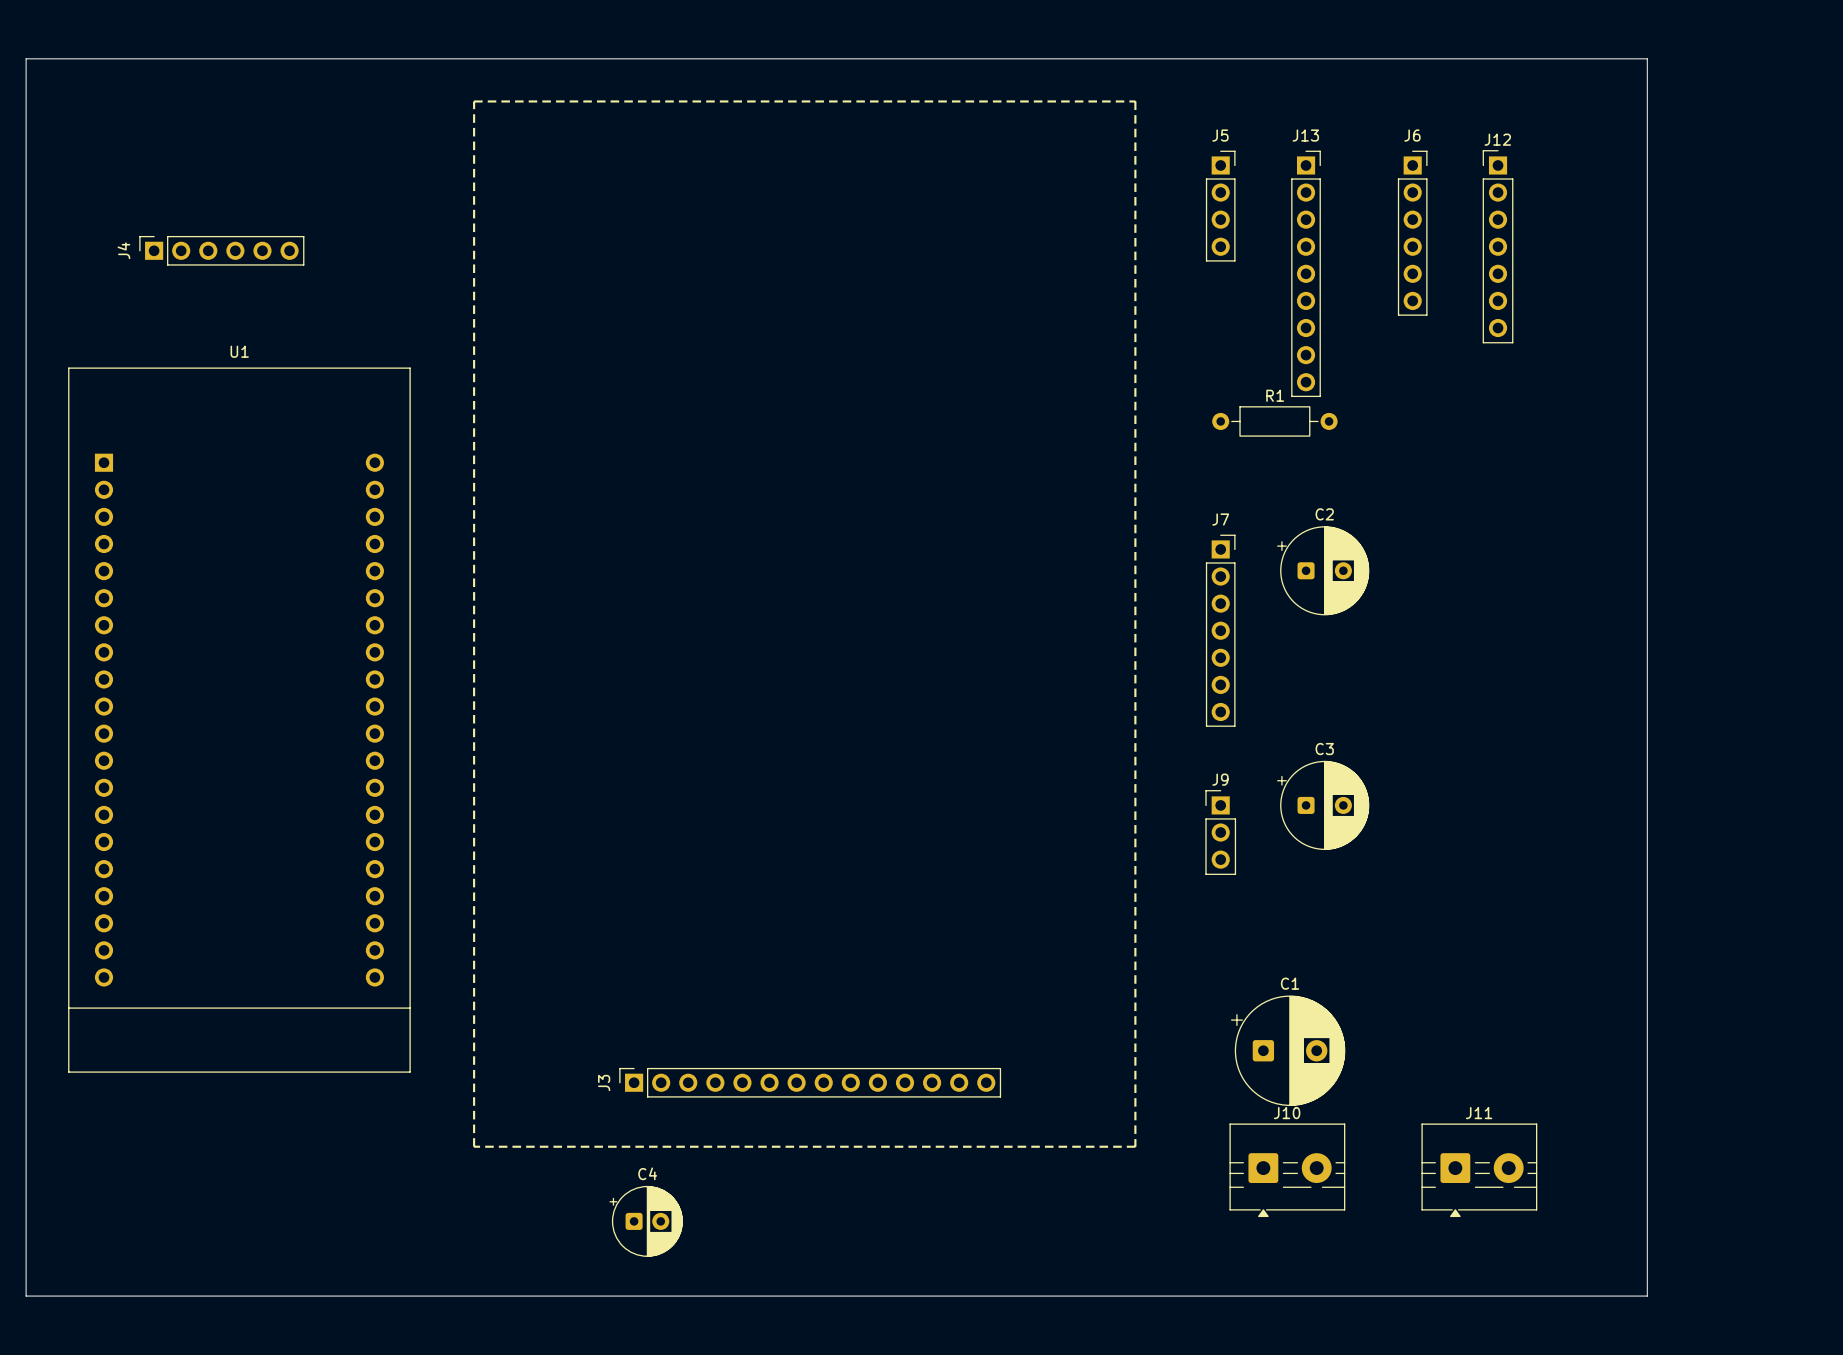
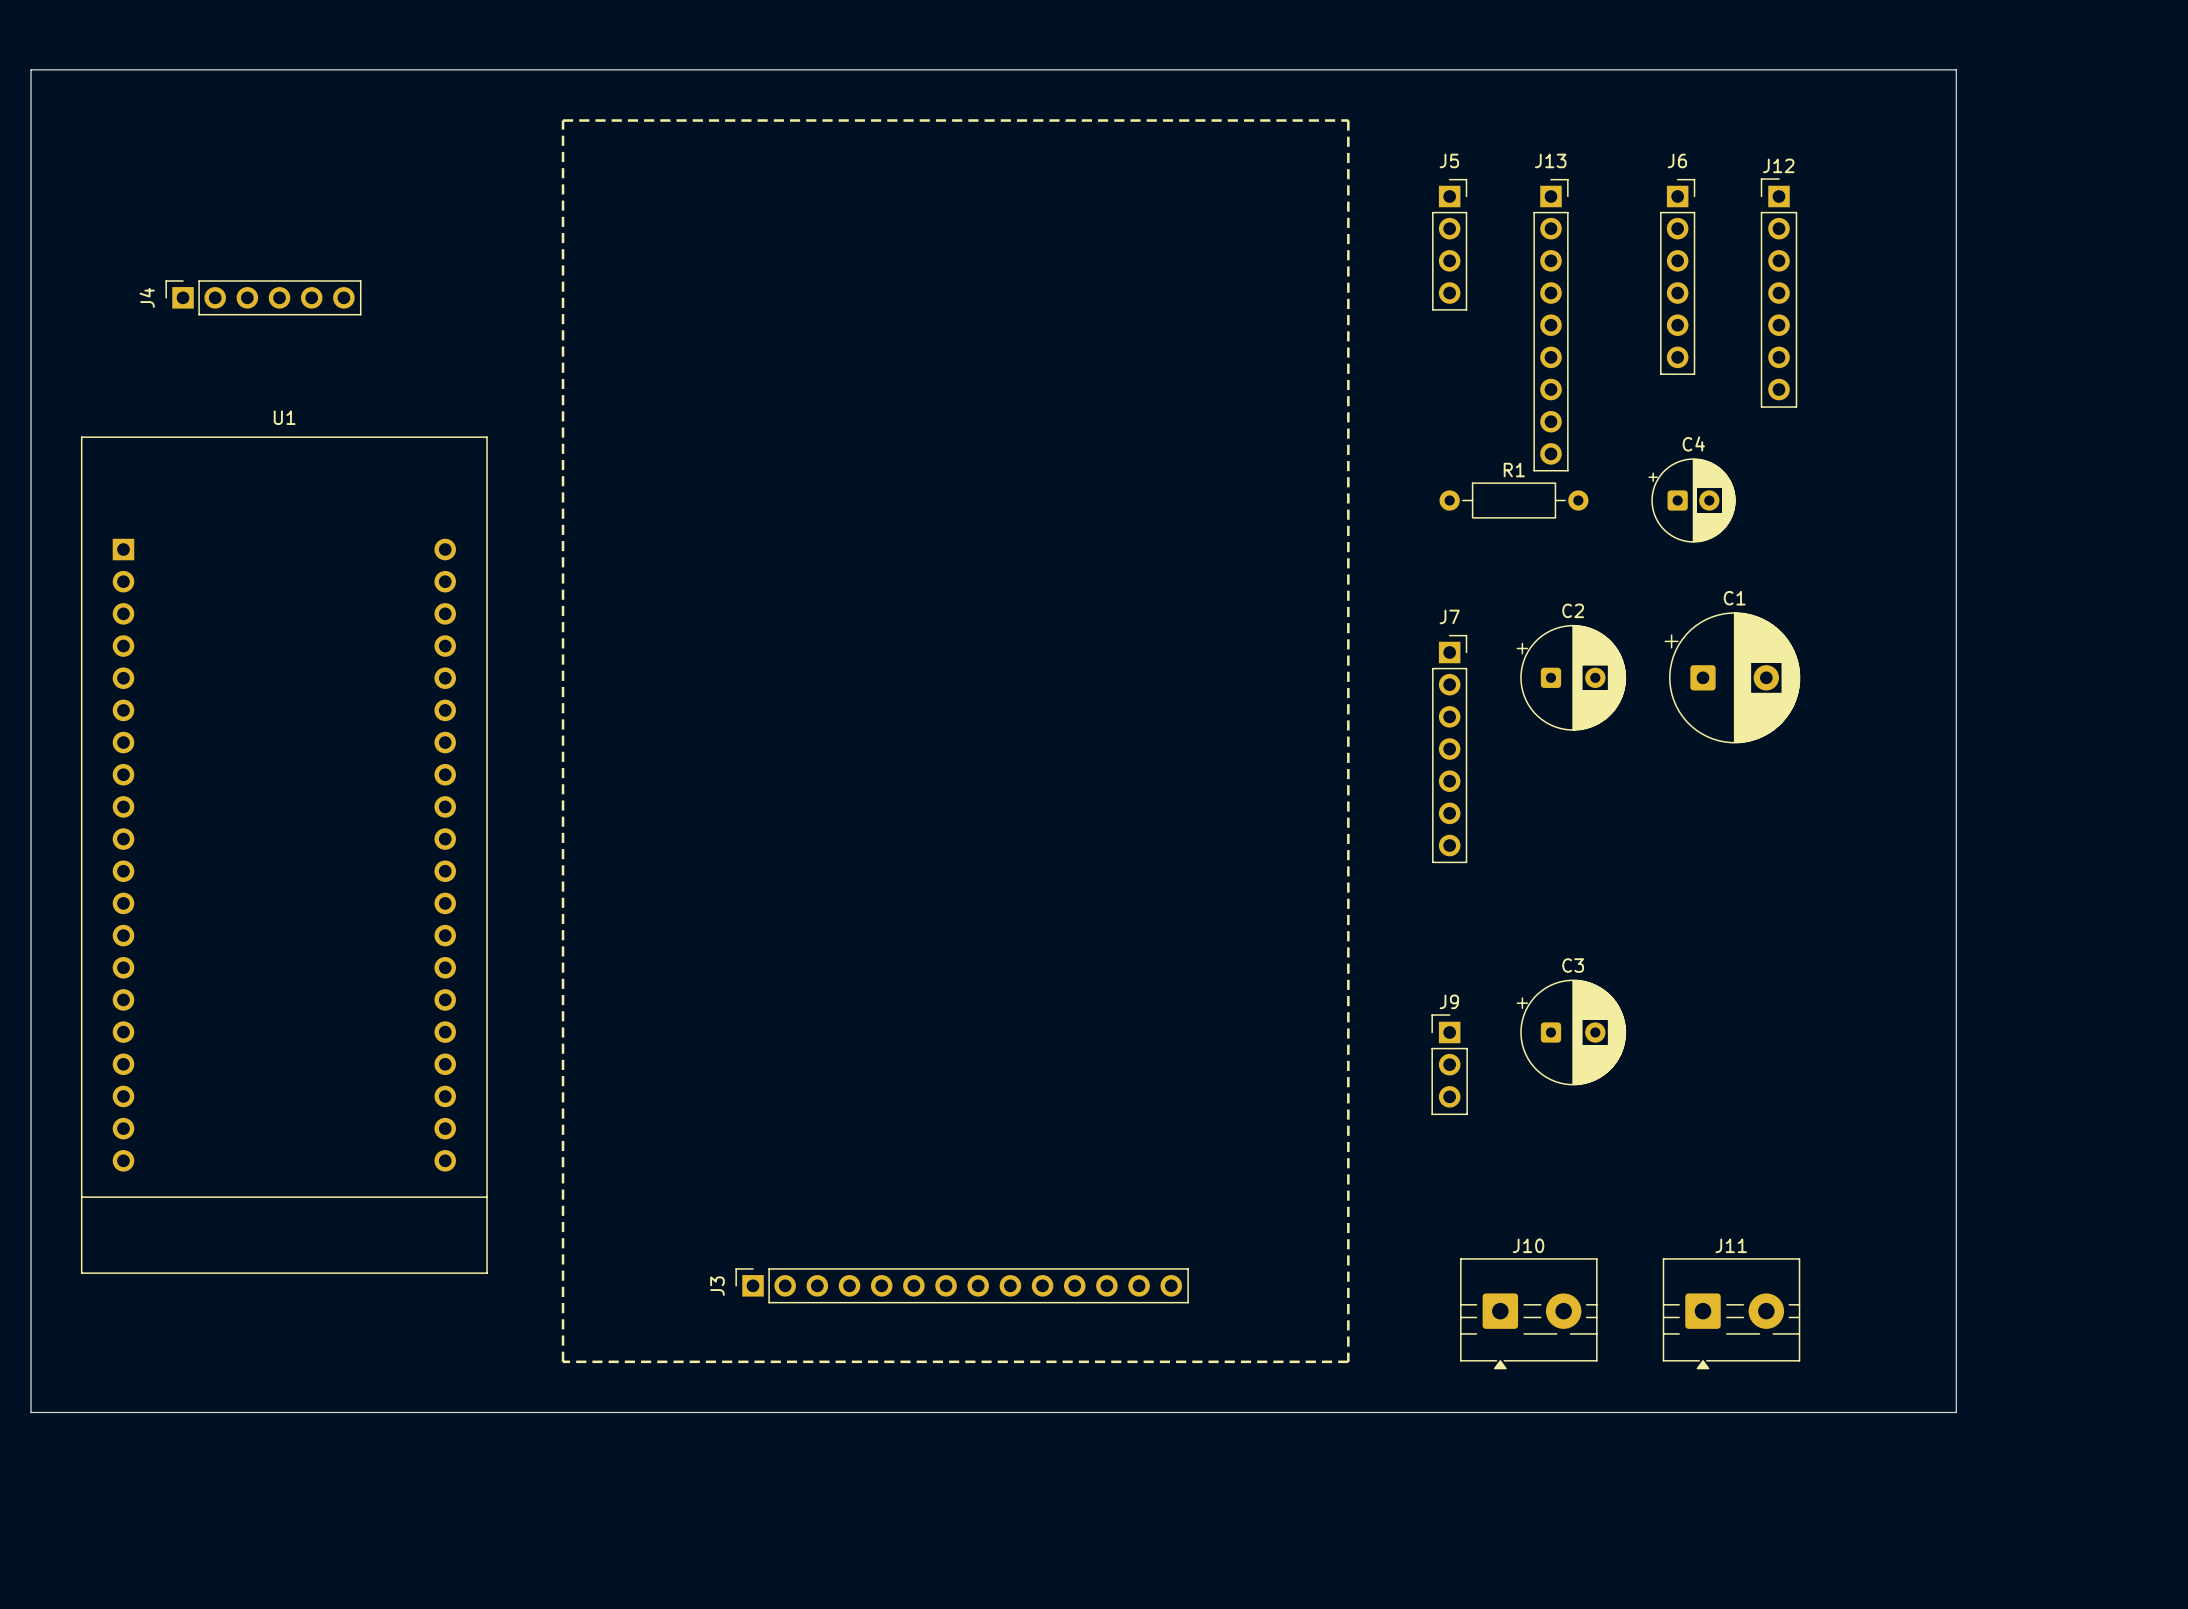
C3 position: (1323, 805) -> (1571, 1032)
J9 position: (1220, 832) -> (1449, 1064)
C1 position: (1288, 1050) -> (1732, 677)
J10 position: (1287, 1170) -> (1528, 1313)
J11 position: (1479, 1170) -> (1731, 1313)
board edge: (26, 1189) (26, 1296) (1647, 1296) (1647, 1189) -> (31, 1412) (1956, 1412)
C4 position: (646, 1221) -> (1692, 500)

